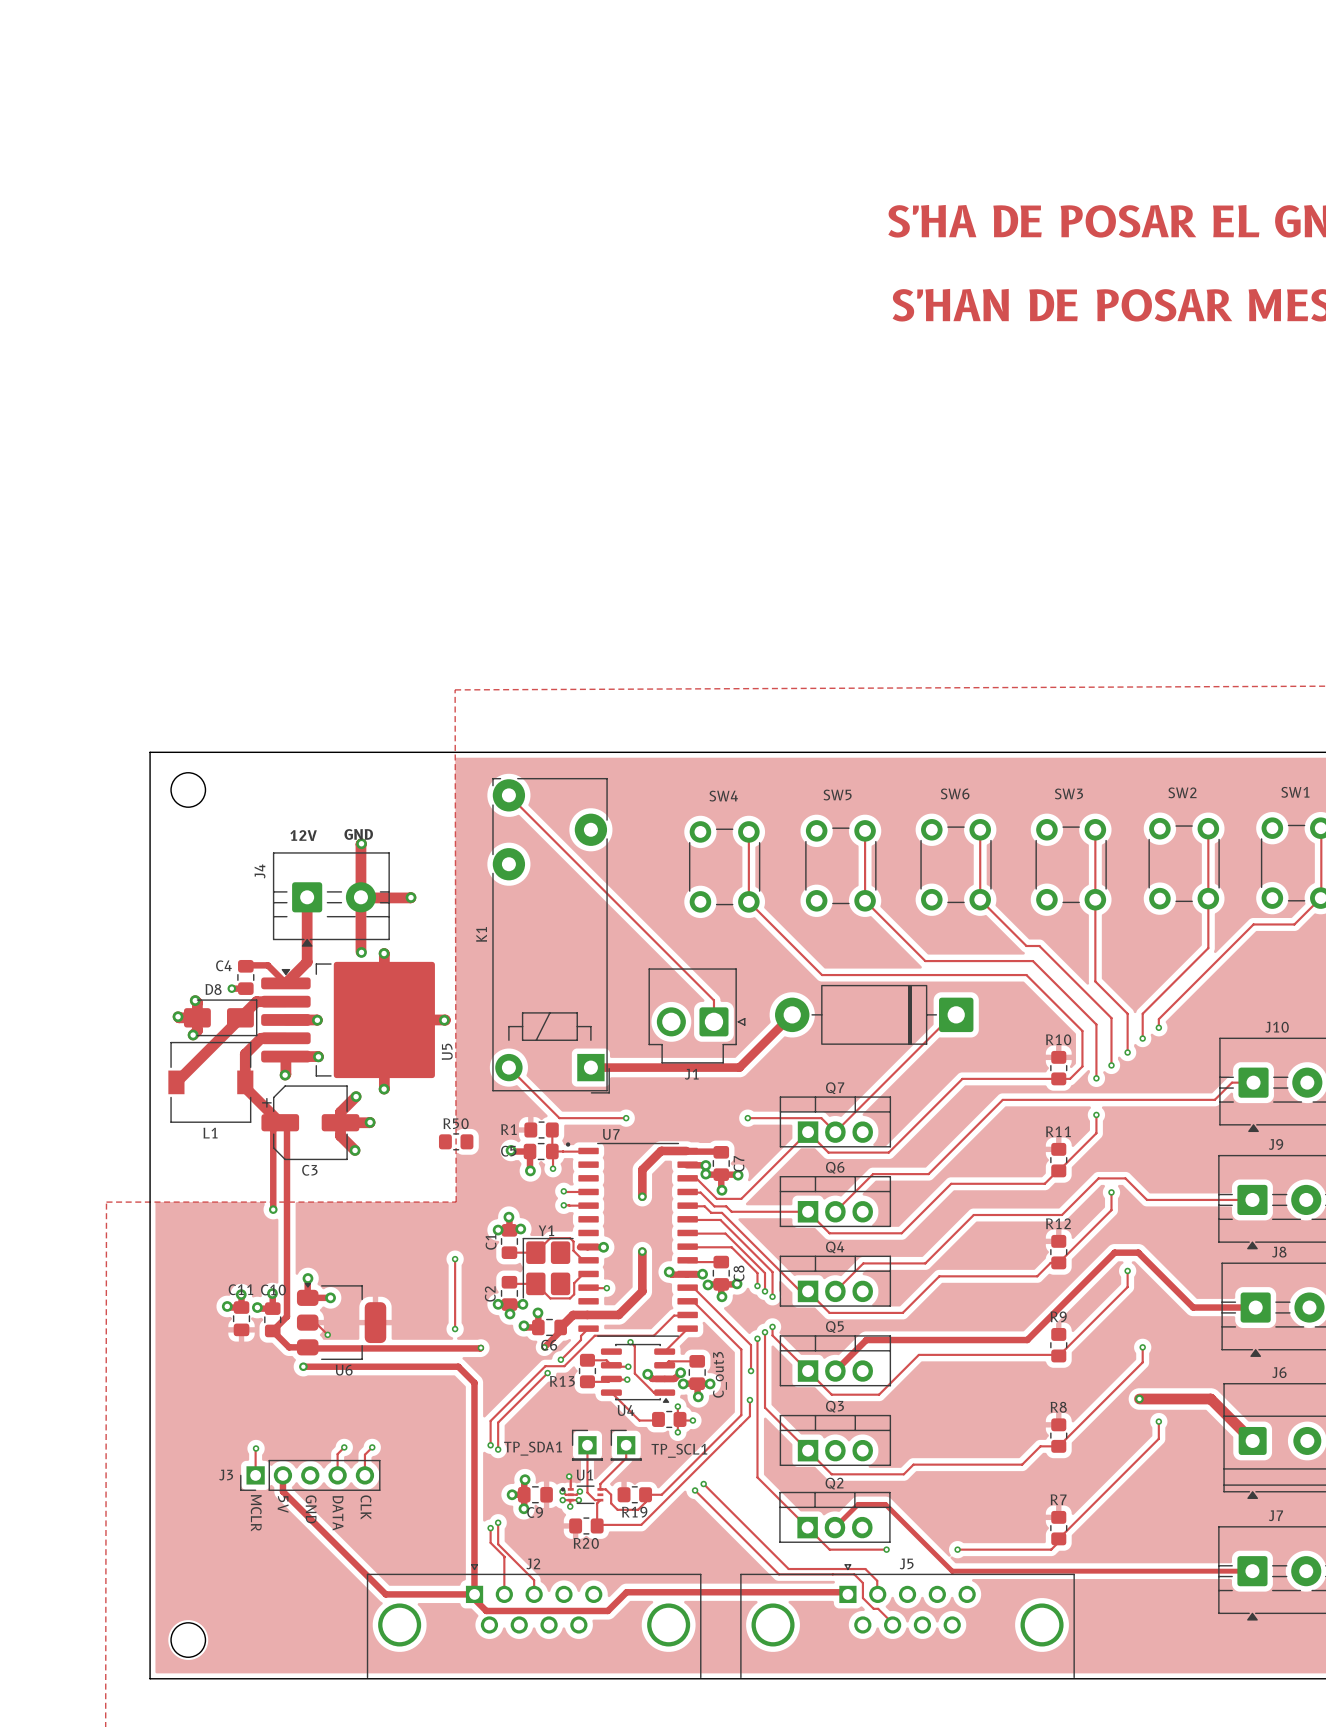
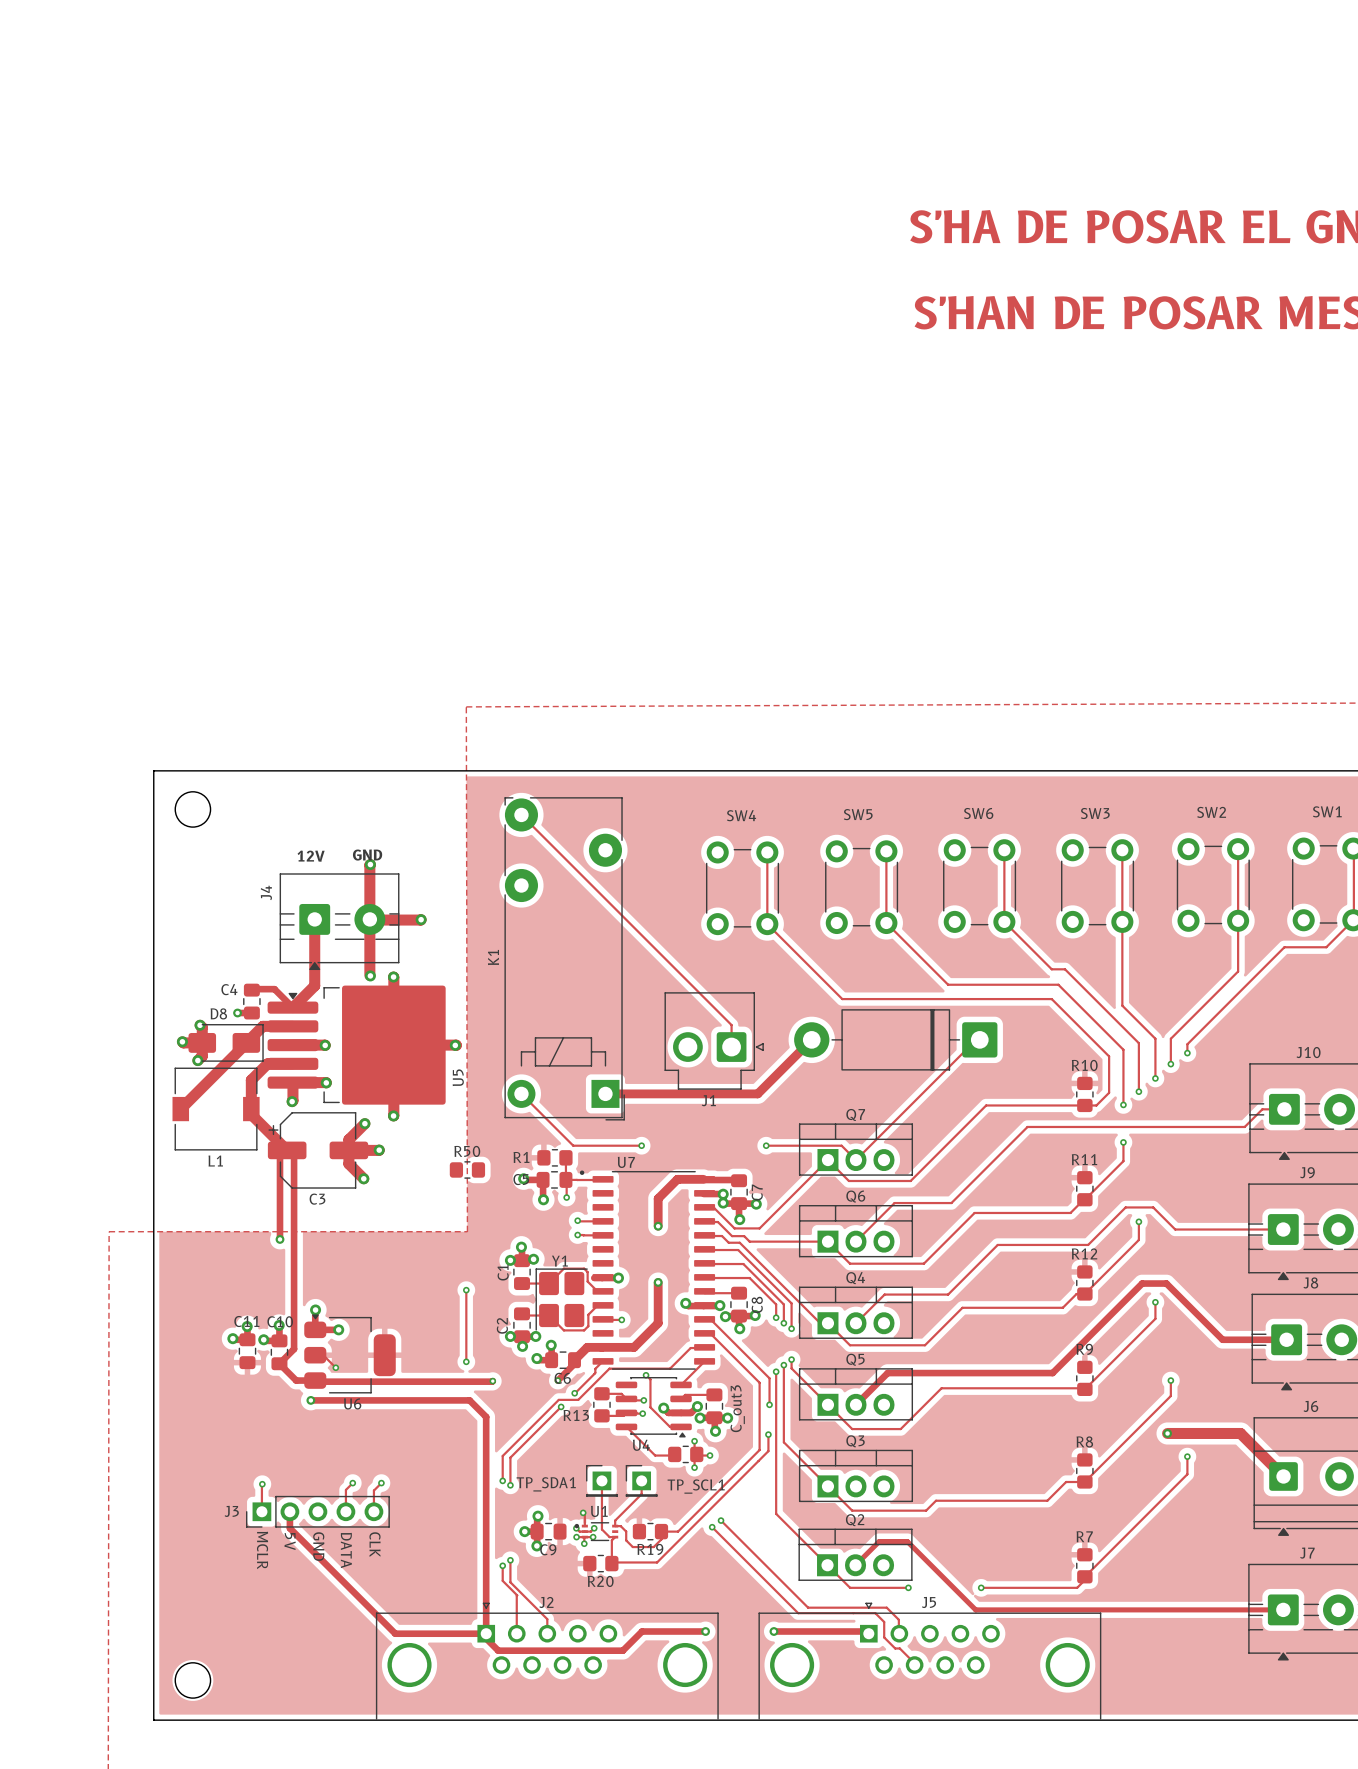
track: (688, 1592) (755, 1592) -> none
via: none -> (705, 1631)
via: none -> (773, 1631)

